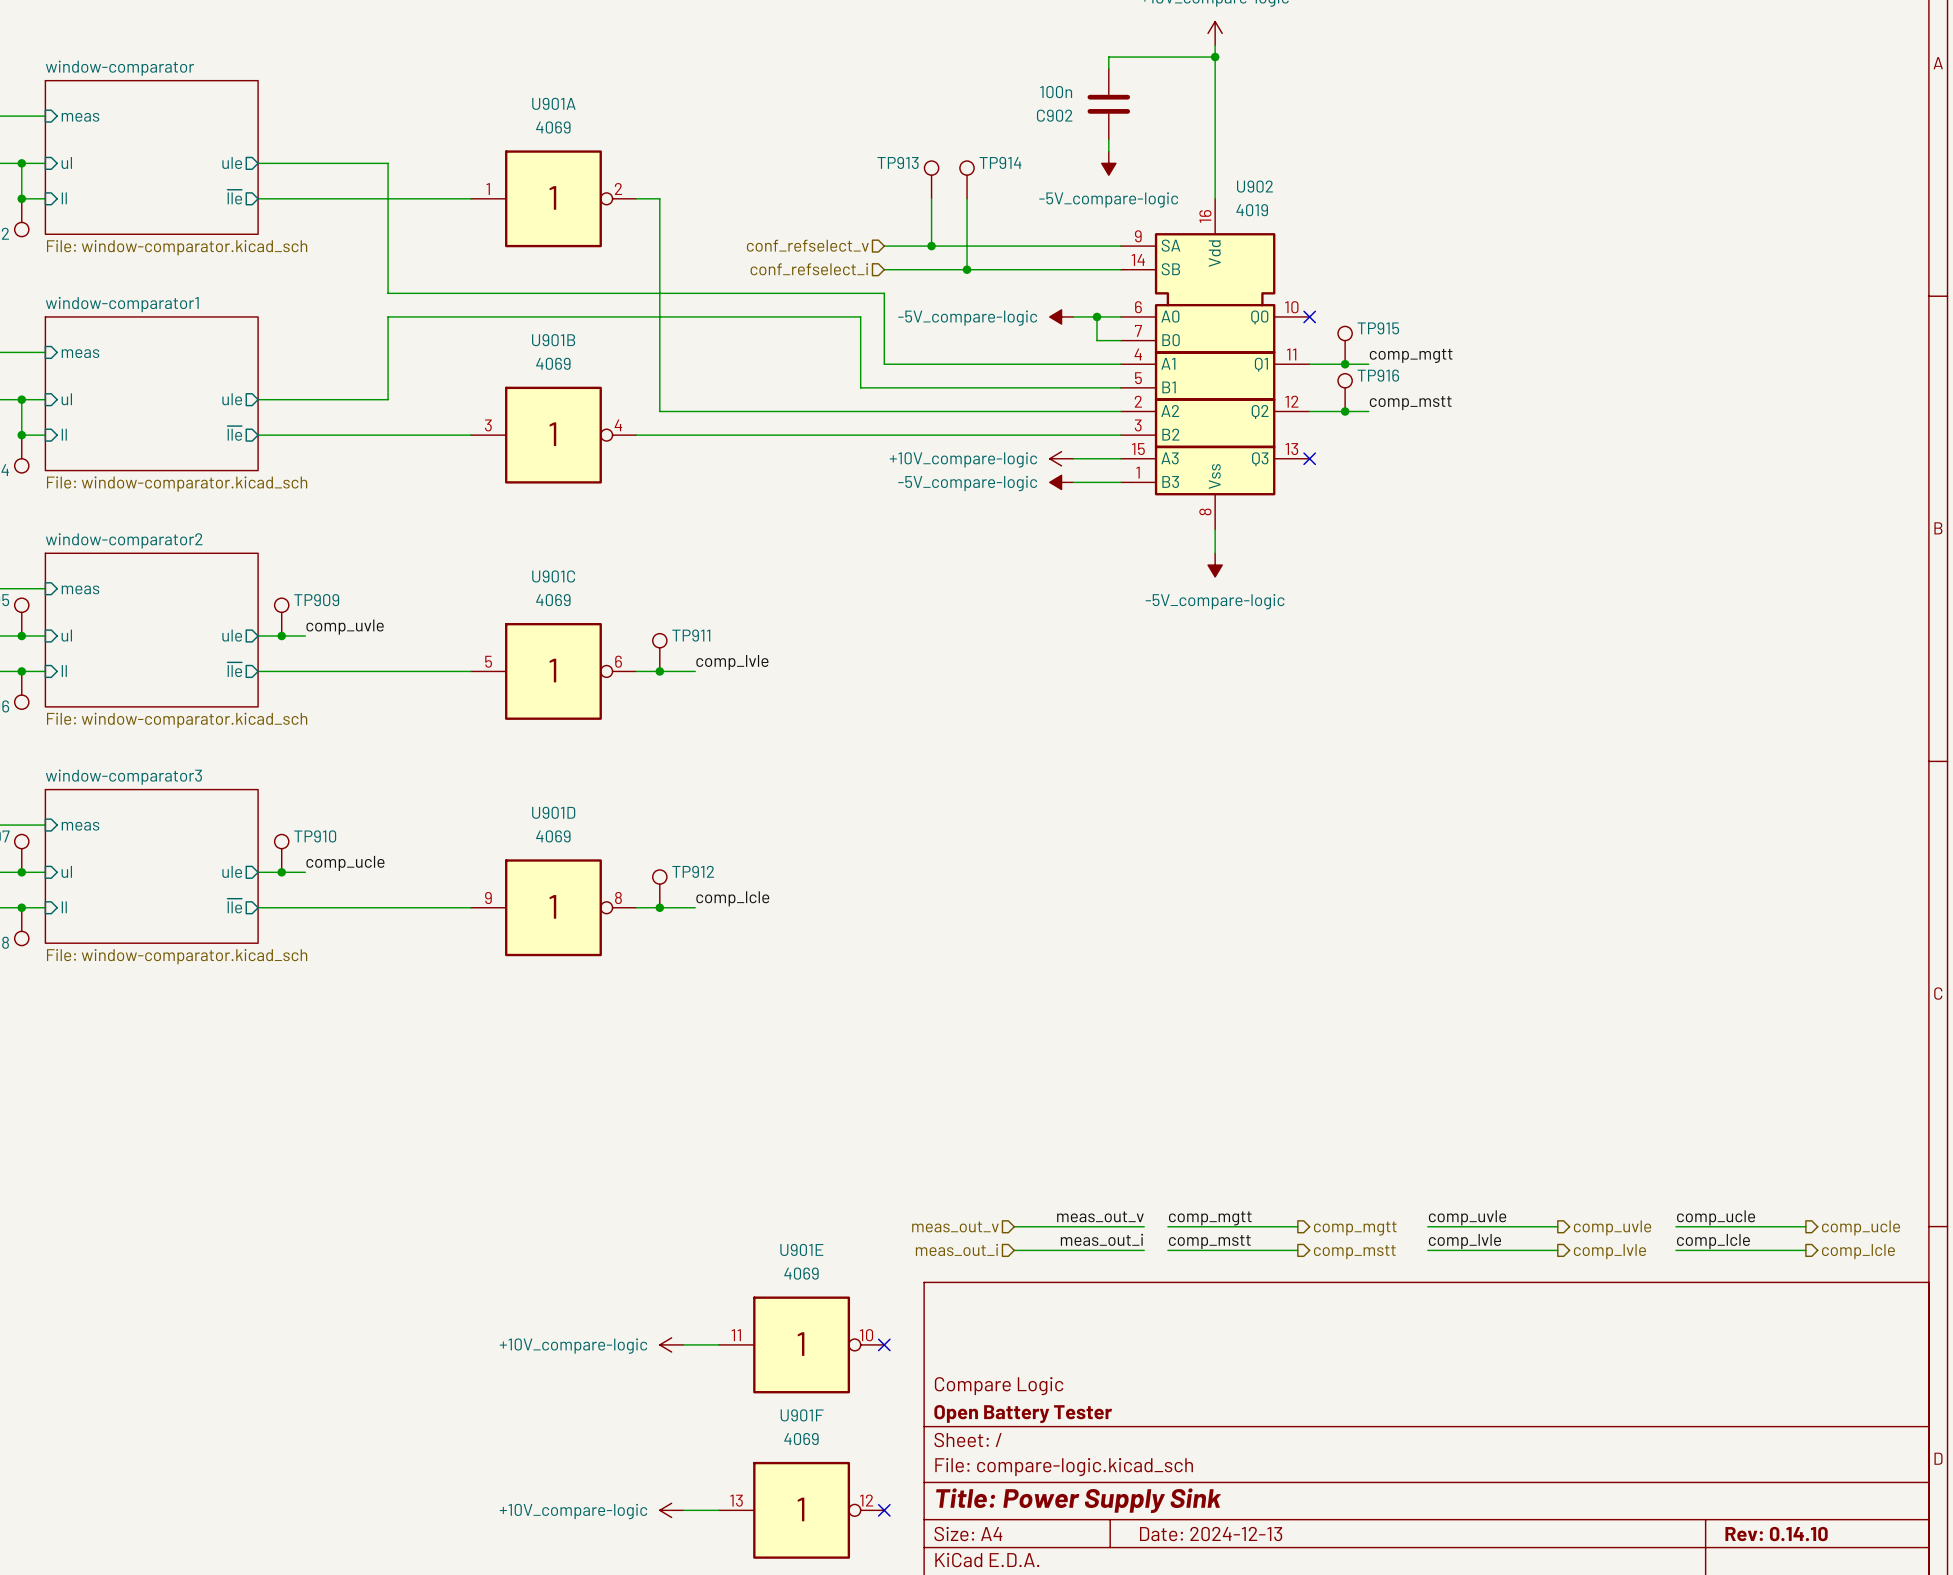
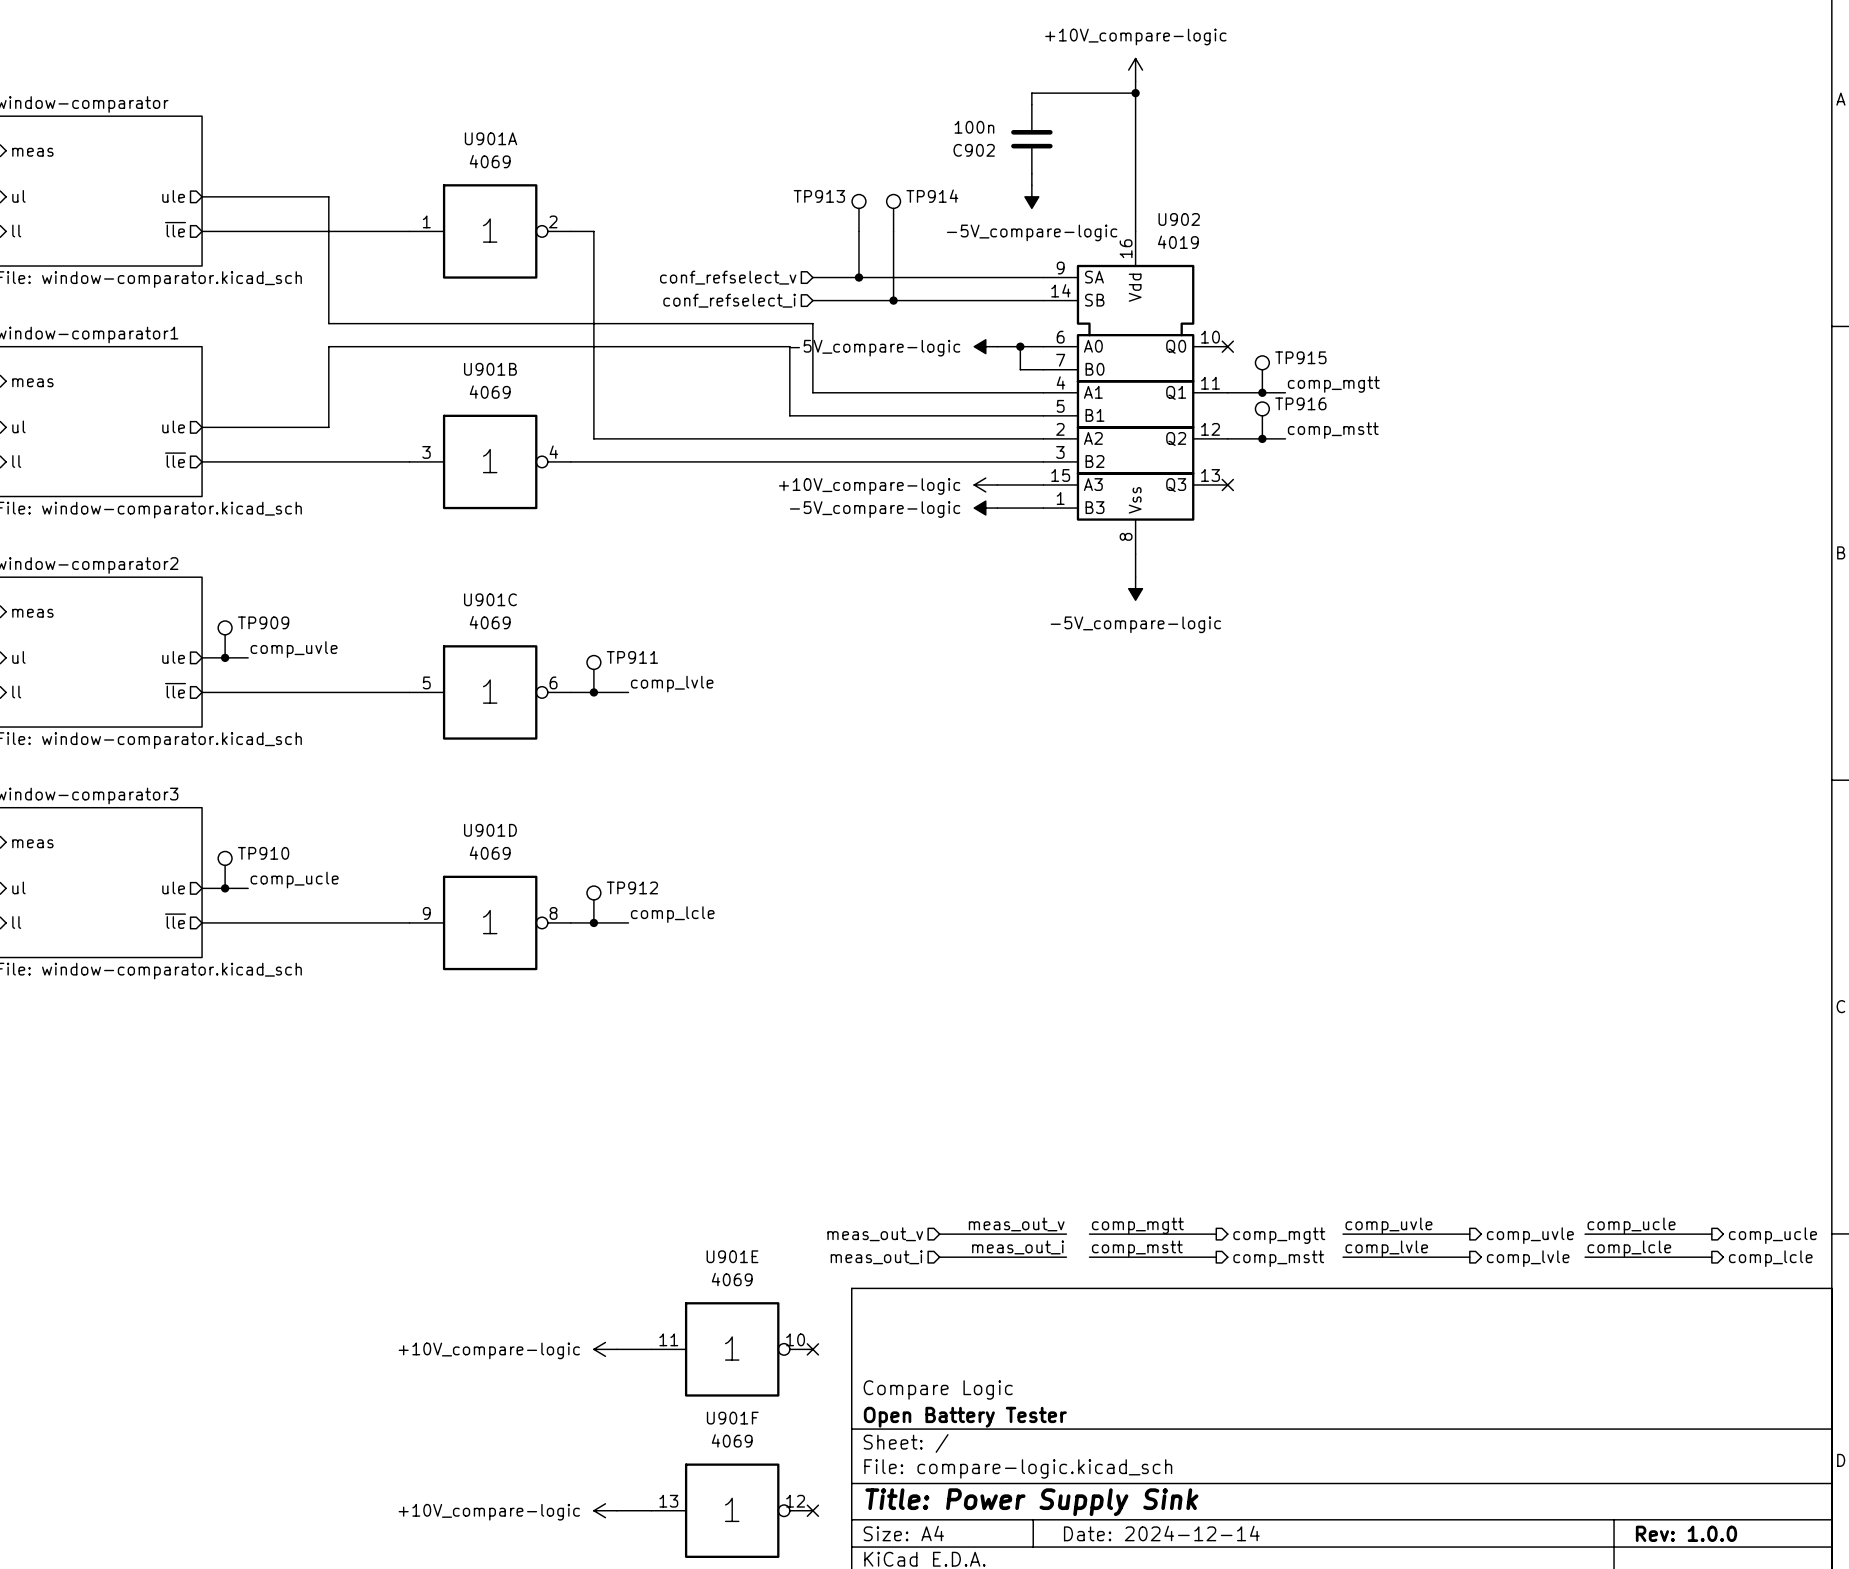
title block: Date: 2024-12-13 (1211, 1534) -> Date: 2024-12-14 (1161, 1533)
title block: Rev: 0.14.10 (1776, 1534) -> Rev: 1.0.0 (1686, 1533)

